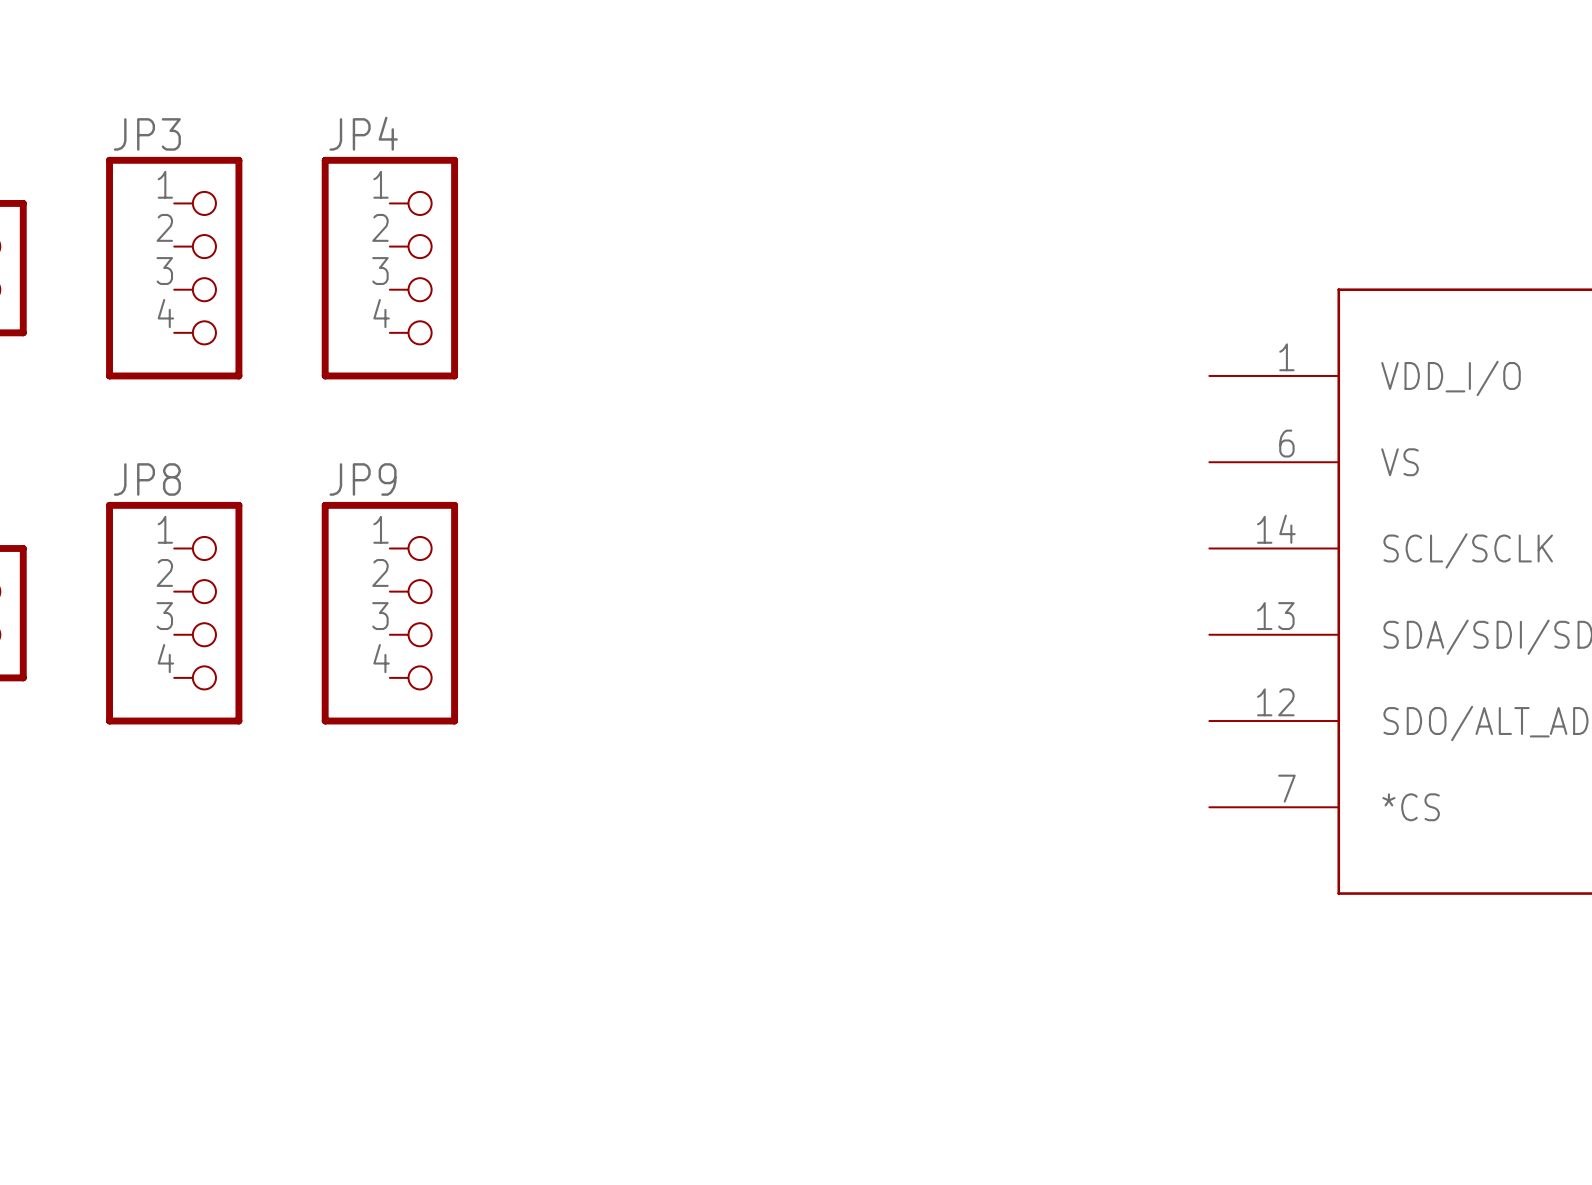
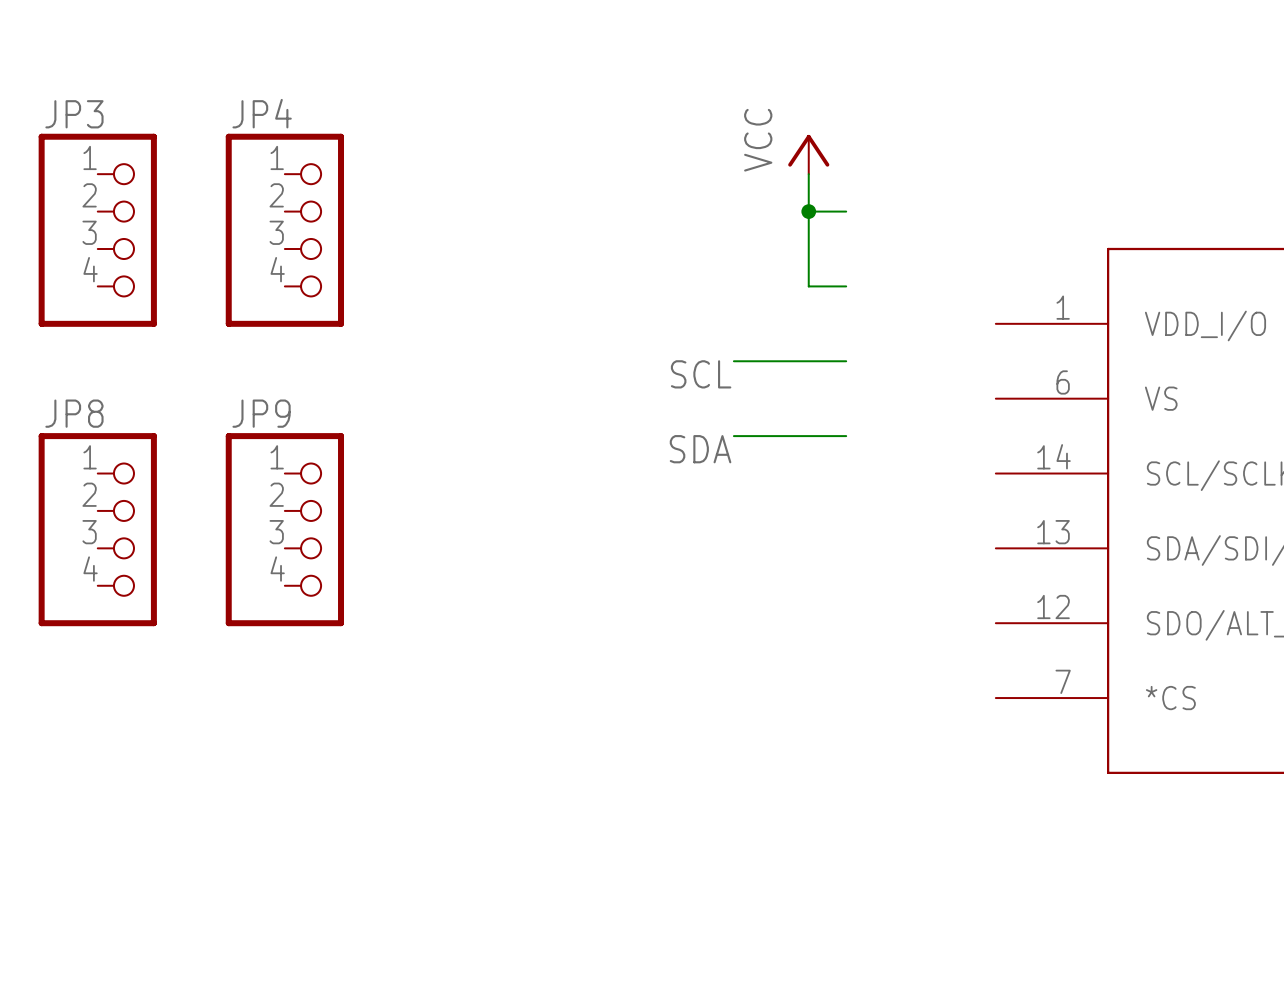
power symbol: none -> VCC (808, 154)
wire: none -> (808, 174) (808, 286) (846, 286)
wire: none -> (808, 211) (846, 211)
junction: none -> (808, 211)
wire: none -> (733, 361) (846, 361)
label: none -> SCL (701, 374)
wire: none -> (733, 436) (846, 436)
label: none -> SDA (700, 449)

